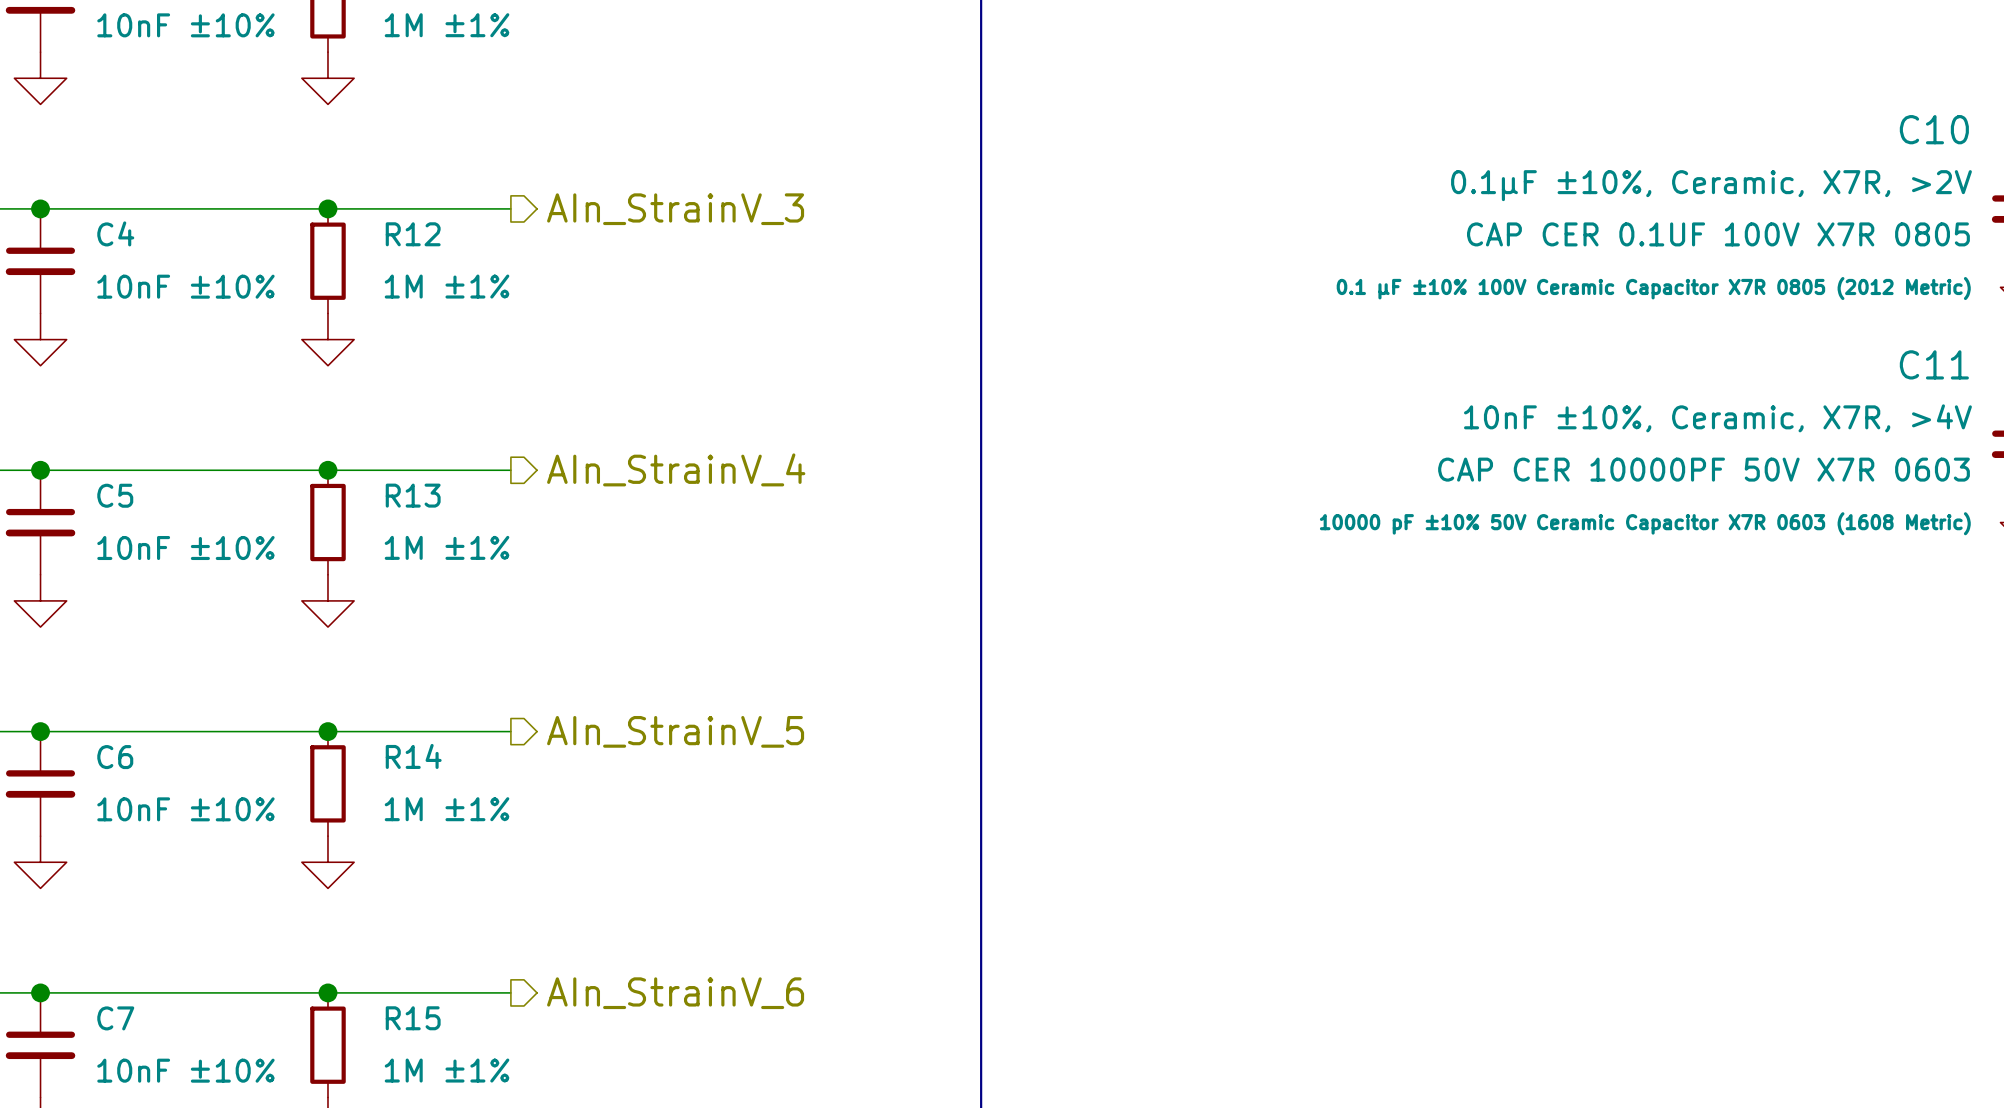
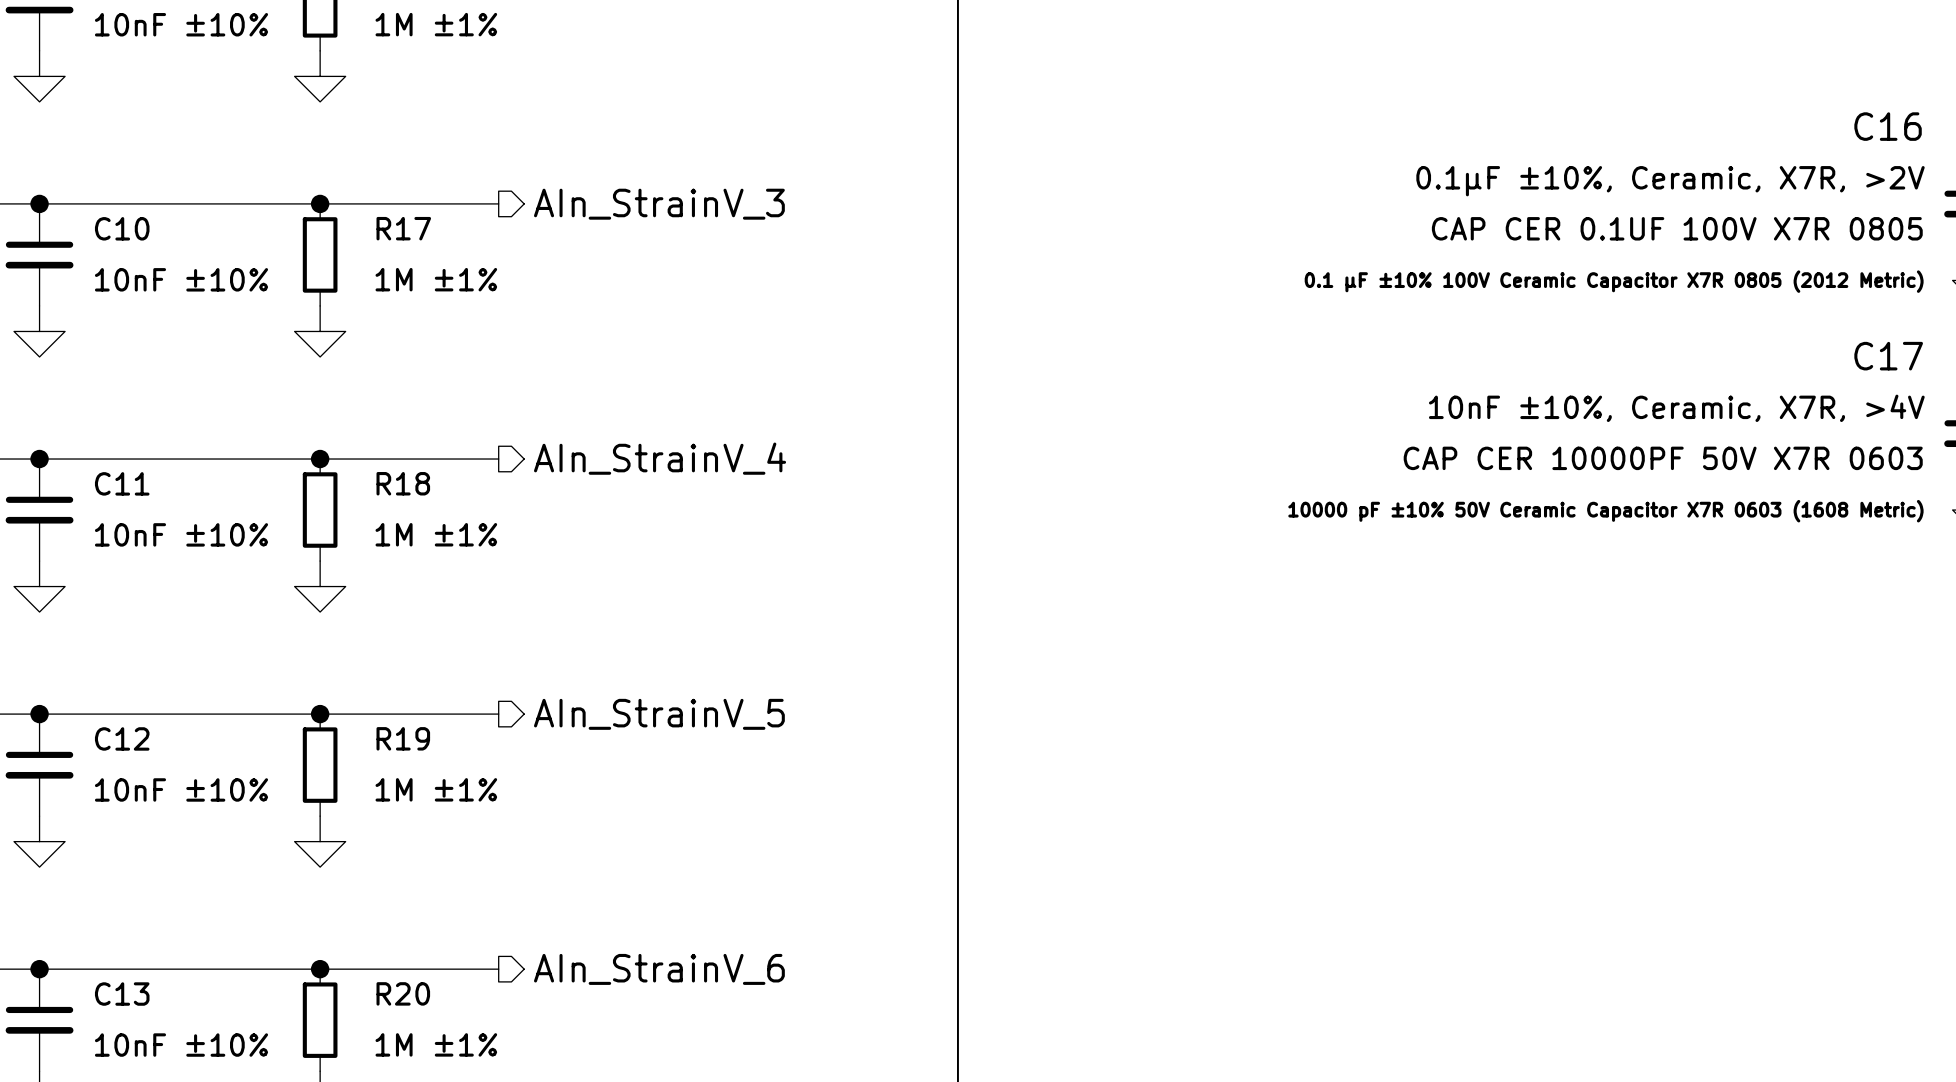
C10 name: C10 (1934, 129) -> C16 (1888, 126)
C4 name: C4 (115, 233) -> C10 (122, 228)
R12 name: R12 (413, 234) -> R17 (403, 228)
C11 name: C11 (1934, 364) -> C17 (1888, 356)
C5 name: C5 (115, 495) -> C11 (122, 483)
R13 name: R13 (413, 495) -> R18 (403, 483)
R14 name: R14 (413, 756) -> R19 (403, 738)
C6 name: C6 (115, 757) -> C12 (122, 738)
C7 name: C7 (115, 1018) -> C13 (122, 994)
R15 name: R15 (413, 1018) -> R20 (403, 993)

